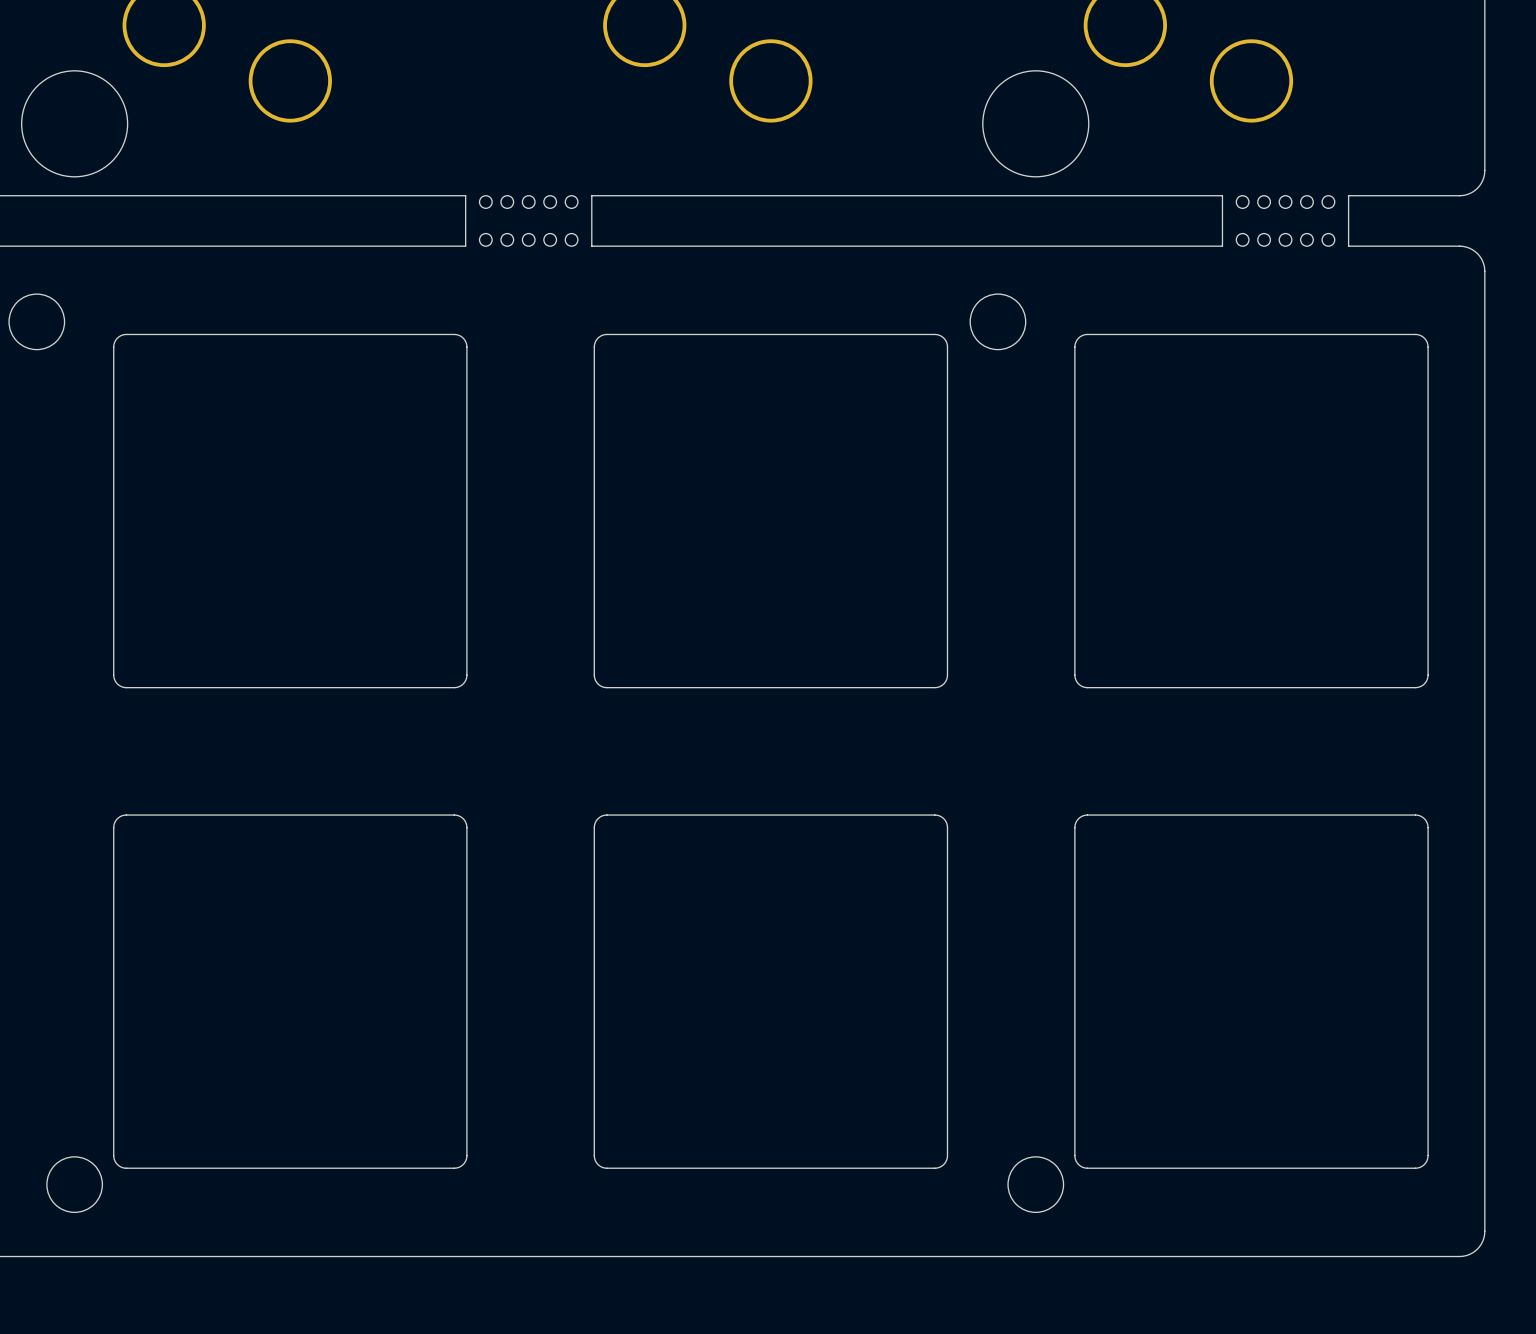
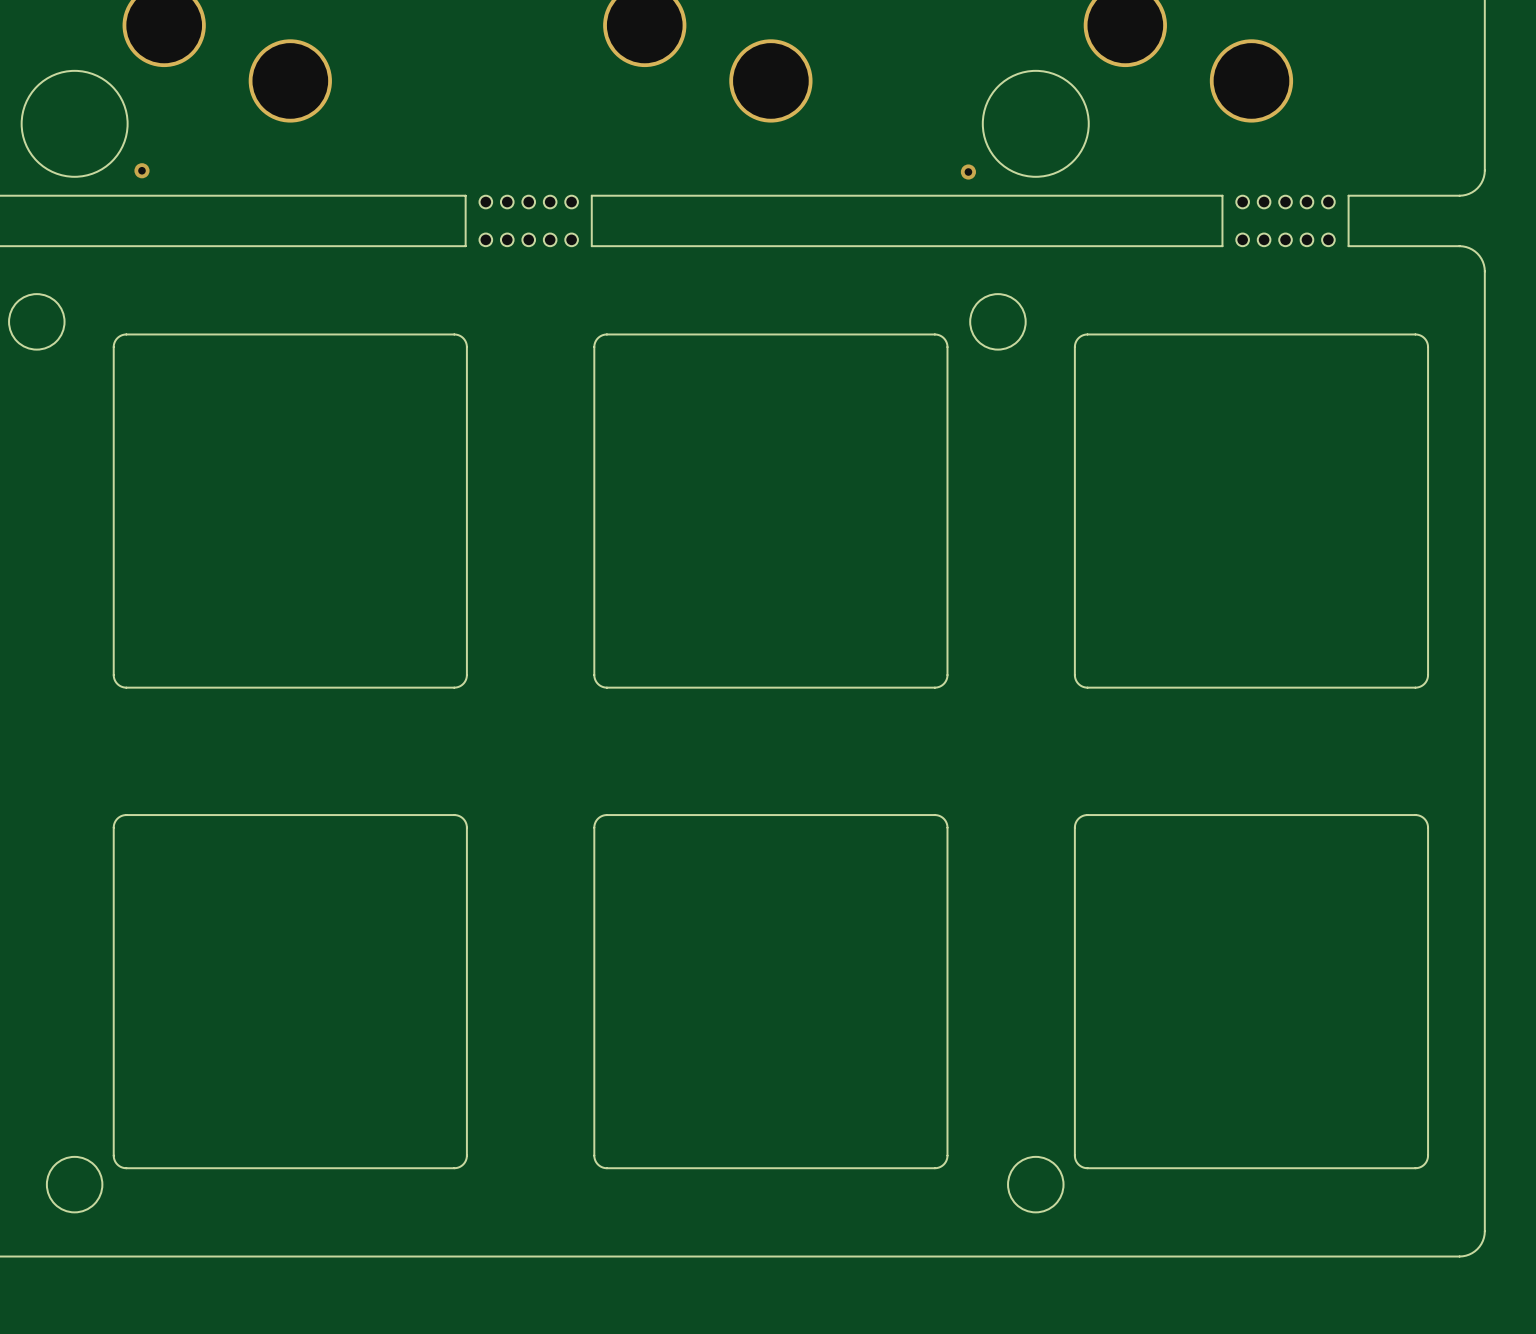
via: none -> (141, 170)
via: none -> (968, 172)

